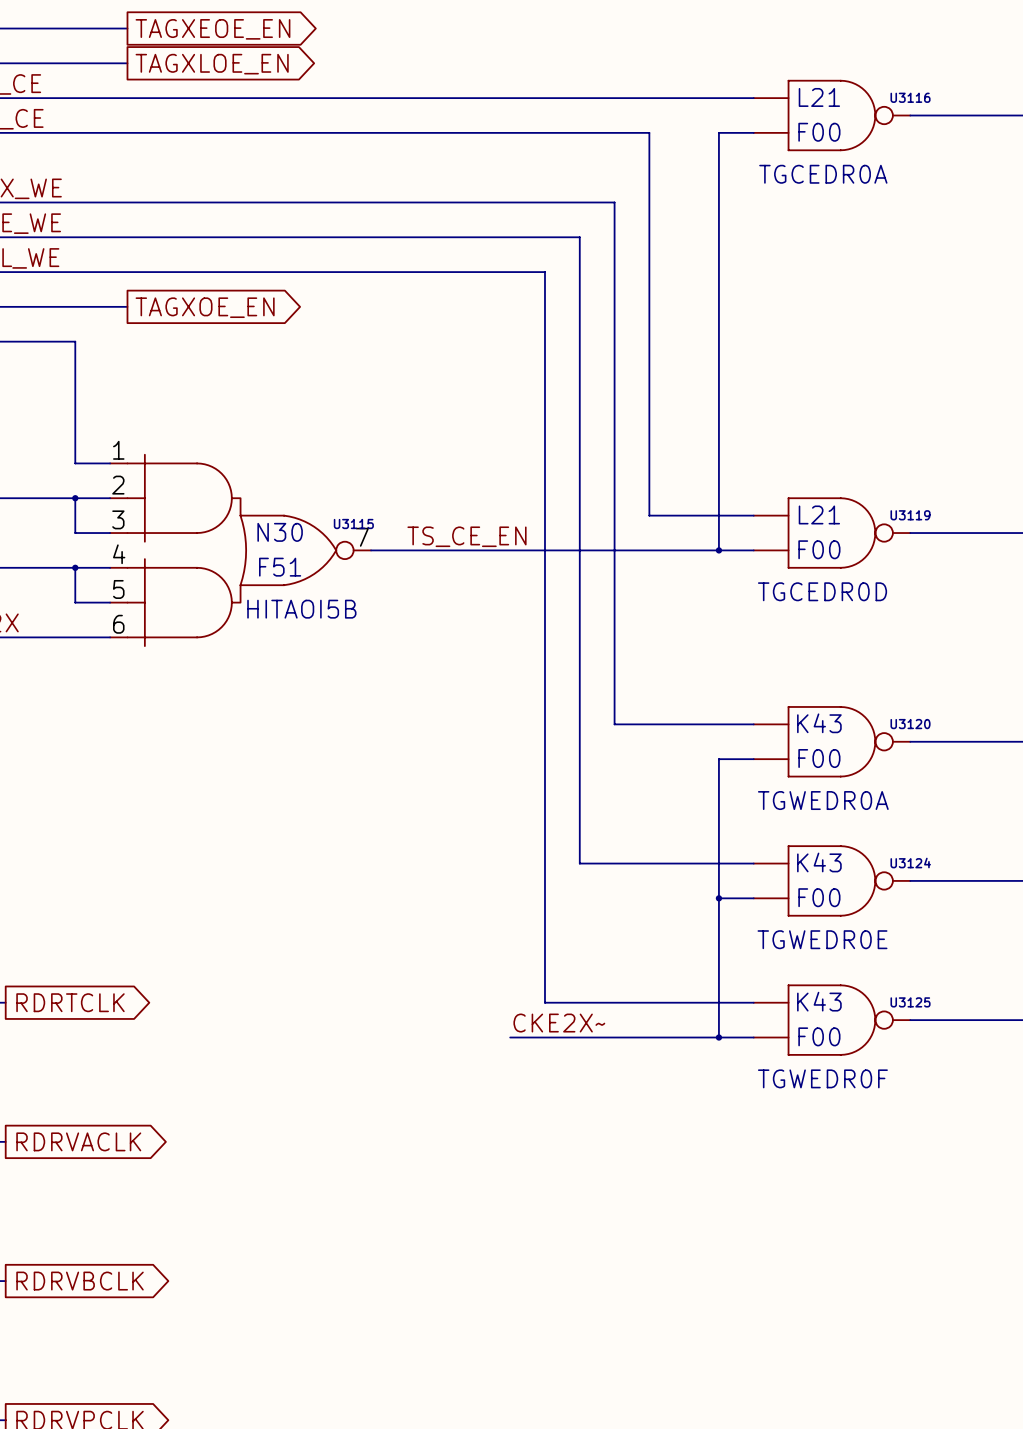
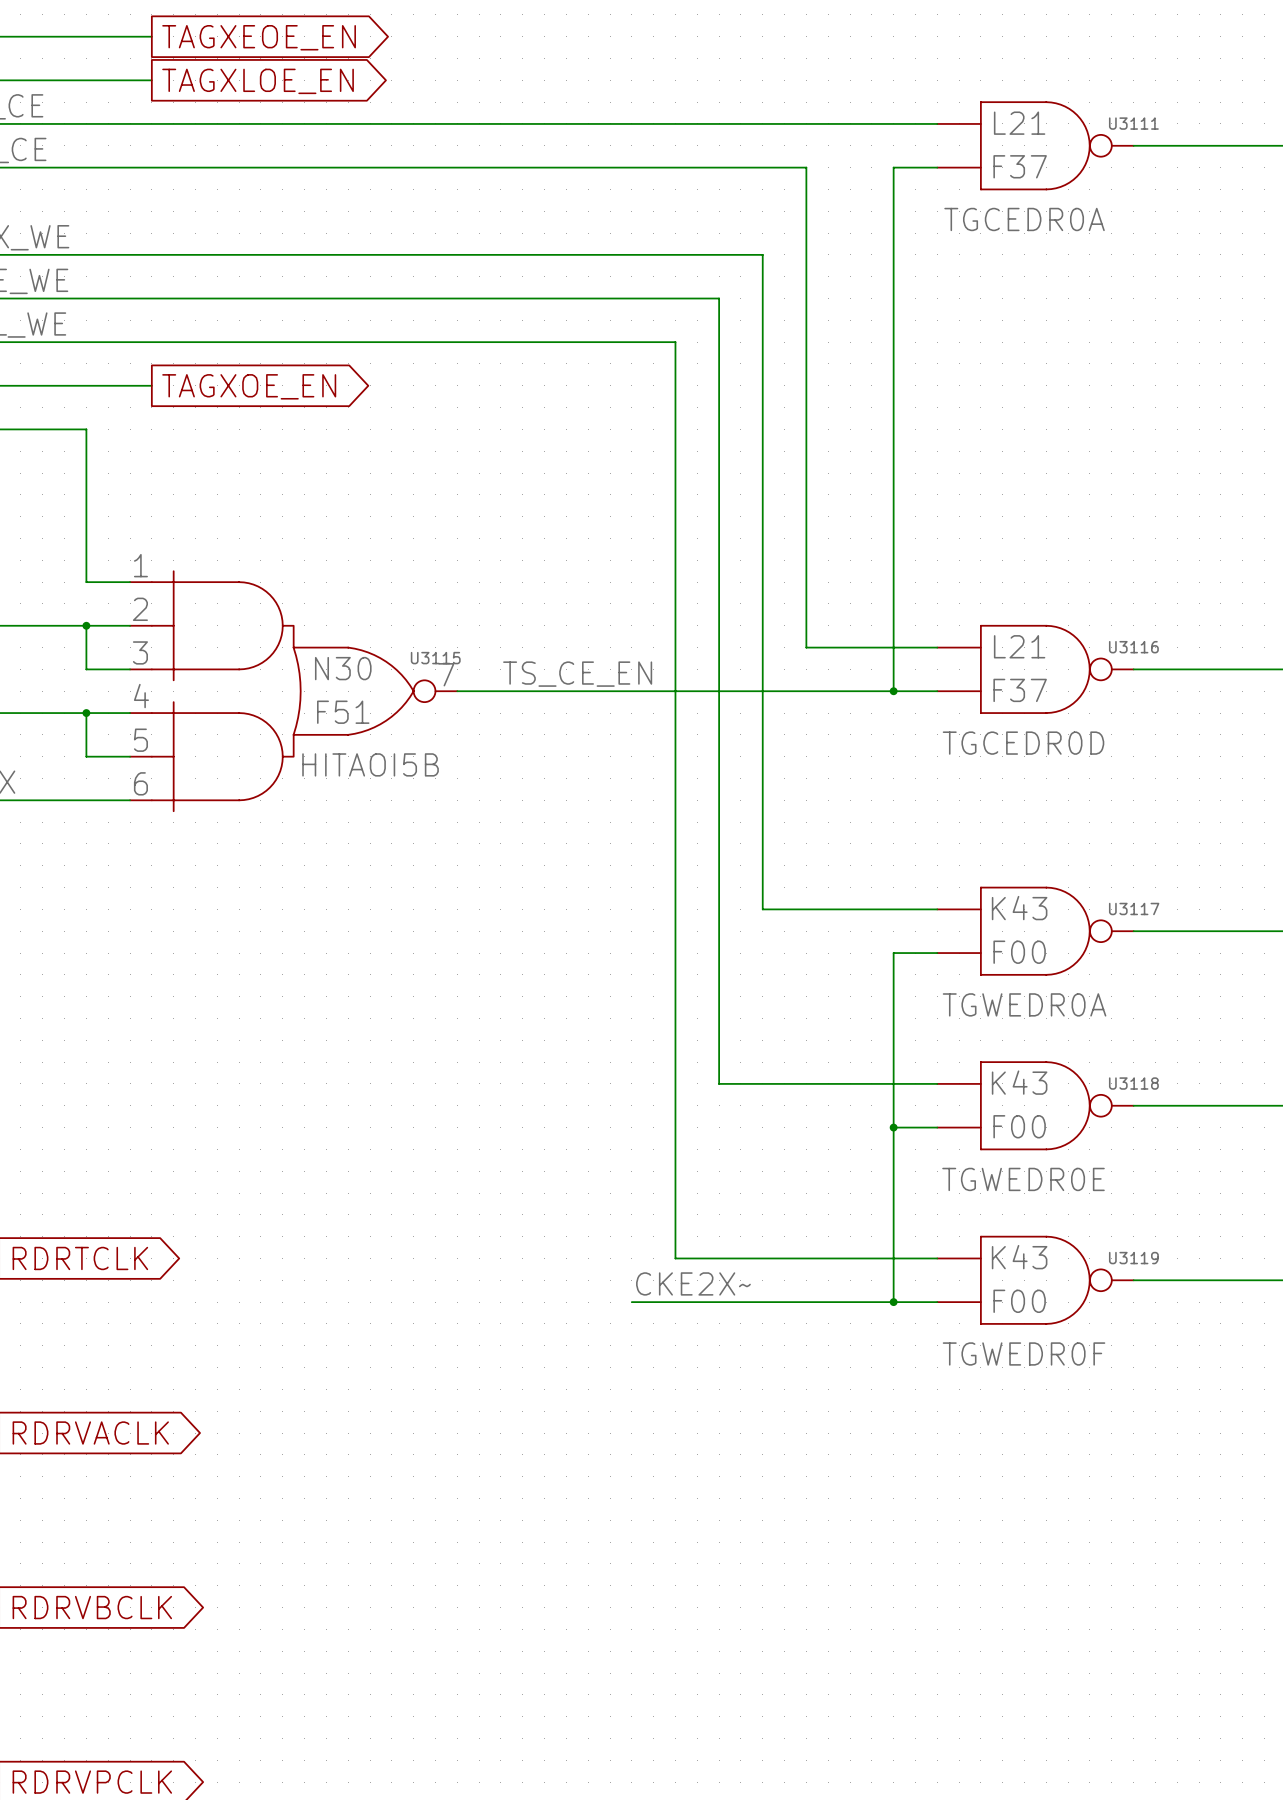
U3116 name: U3116 (910, 97) -> U3111 (1133, 123)
U3116 value: F00 (819, 132) -> F37 (1020, 166)
U3119 name: U3119 (910, 515) -> U3116 (1133, 647)
U3119 value: F00 (819, 549) -> F37 (1020, 690)
U3120 name: U3120 (910, 724) -> U3117 (1134, 908)
U3124 name: U3124 (910, 863) -> U3118 (1133, 1083)
U3125 name: U3125 (910, 1002) -> U3119 (1133, 1258)

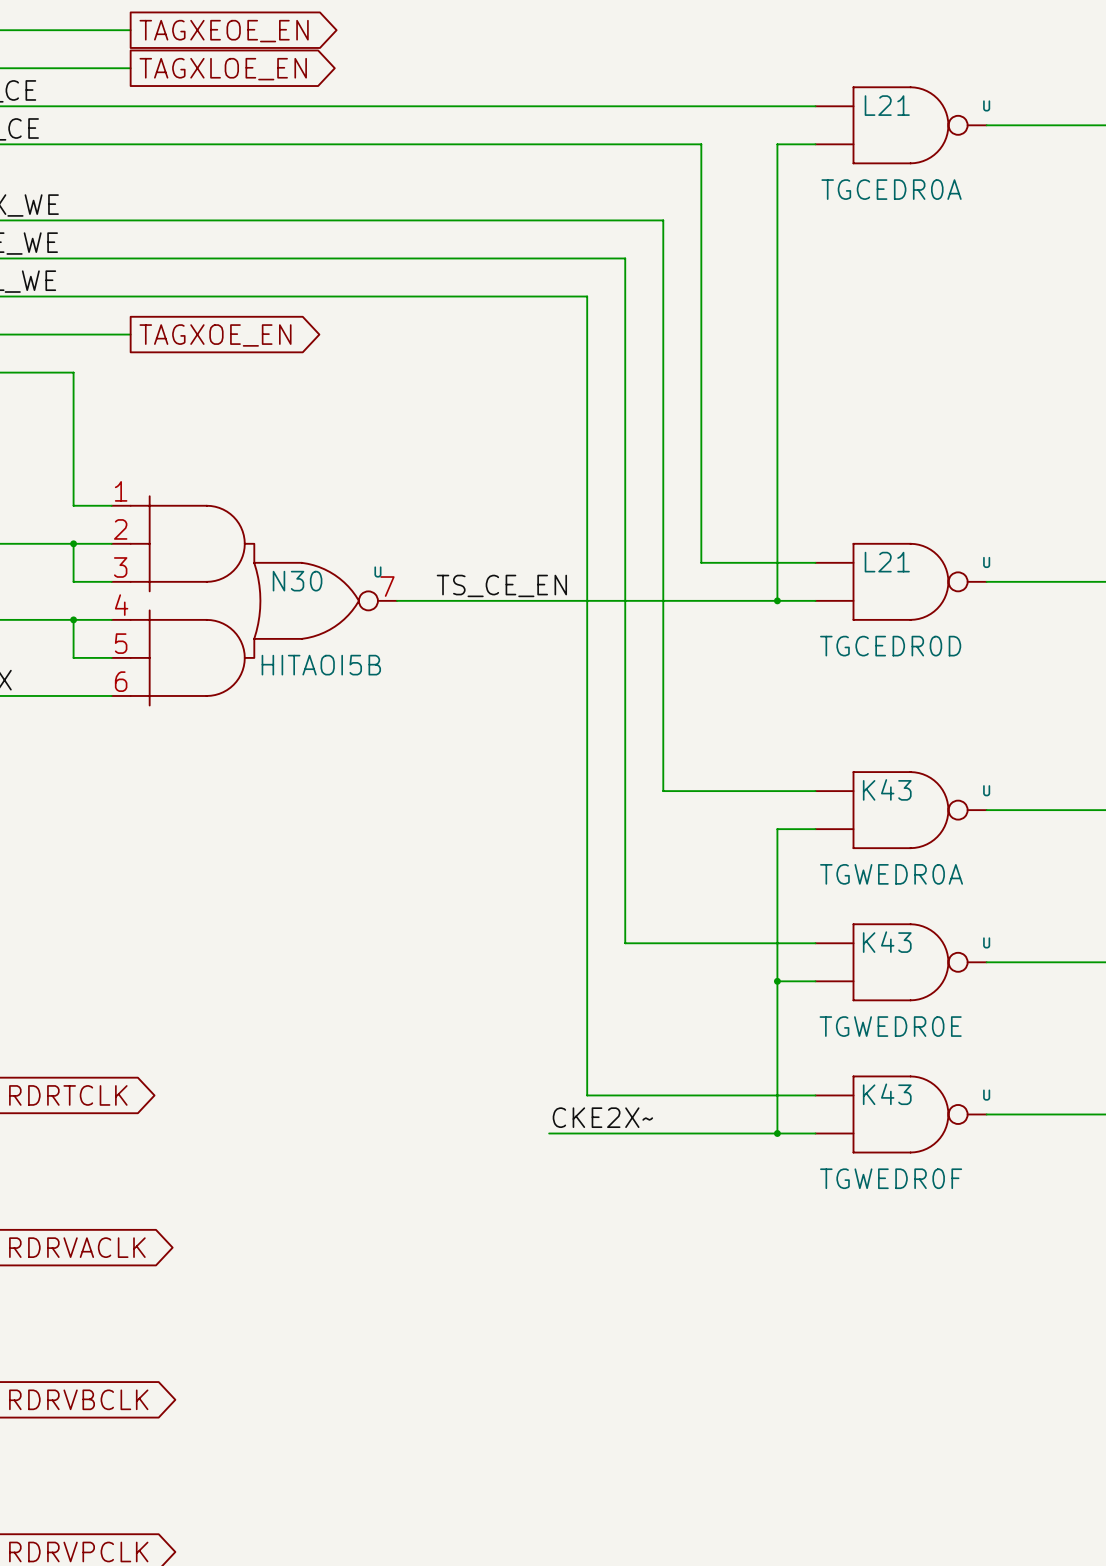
U3111 name: U3111 (1133, 123) -> U (986, 105)
U3111 value: F37 (1020, 166) -> none
U3116 name: U3116 (1133, 647) -> U (986, 562)
U3115 name: U3115 (435, 658) -> U (377, 571)
U3116 value: F37 (1020, 690) -> none
U3115 value: F51 (343, 712) -> none
U3117 name: U3117 (1134, 908) -> U (986, 790)
U3117 value: F00 (1019, 952) -> none
U3118 name: U3118 (1133, 1083) -> U (986, 942)
U3118 value: F00 (1019, 1126) -> none
U3119 name: U3119 (1133, 1258) -> U (986, 1095)
U3119 value: F00 (1019, 1301) -> none

